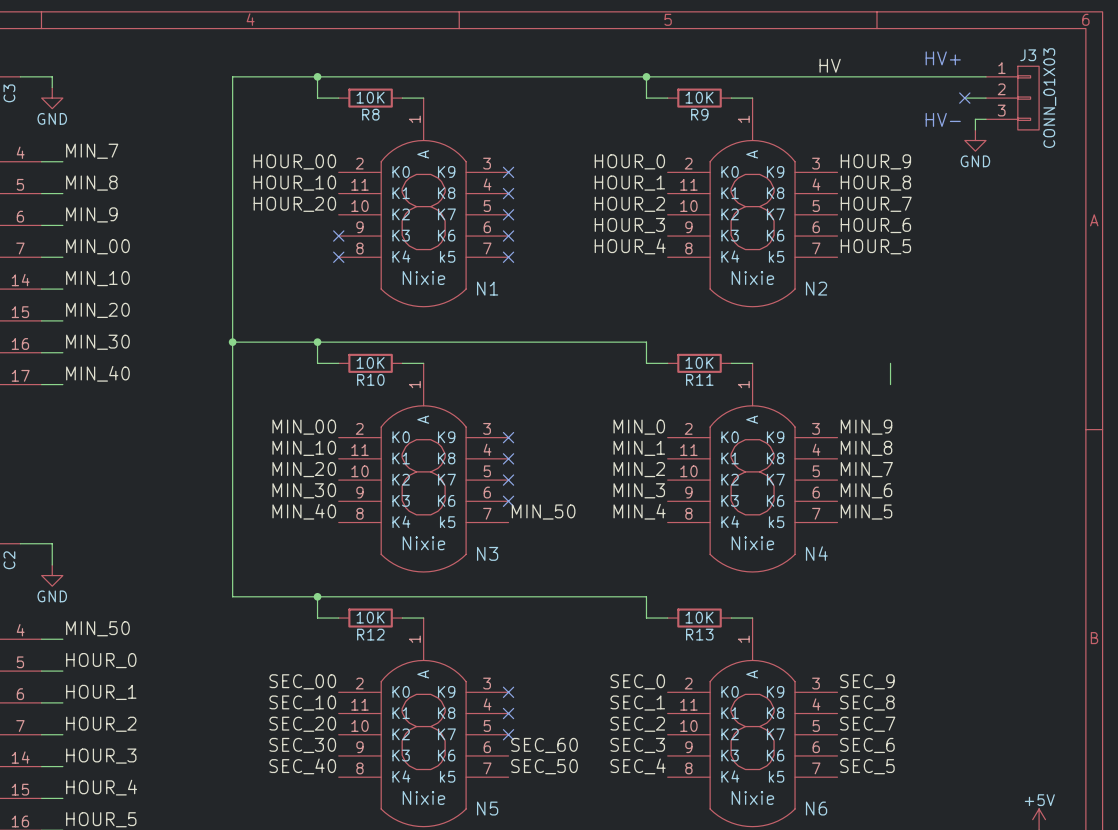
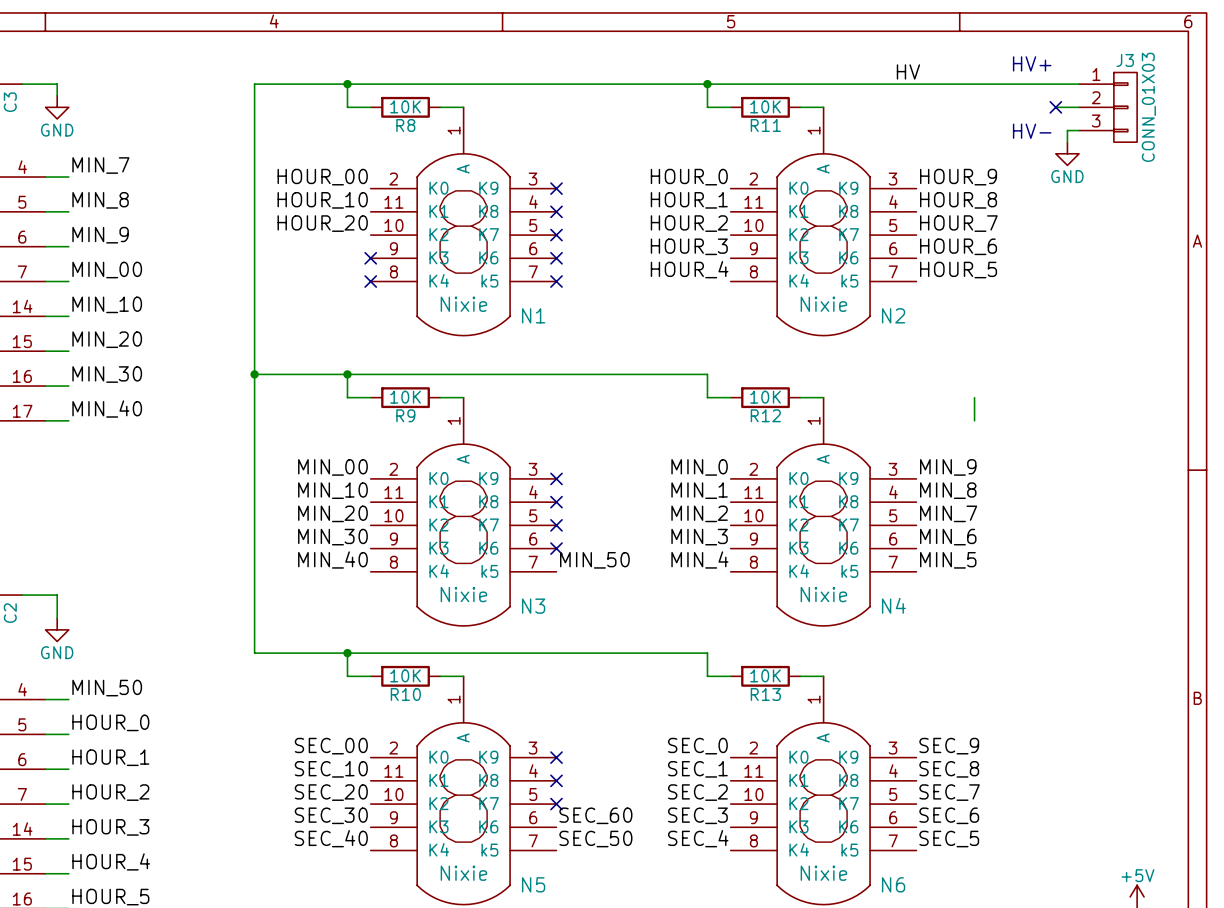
R9 name: R9 (699, 114) -> R11 (765, 125)
R10 name: R10 (370, 379) -> R9 (405, 415)
R11 name: R11 (699, 379) -> R12 (765, 415)
R12 name: R12 (370, 634) -> R10 (405, 694)

